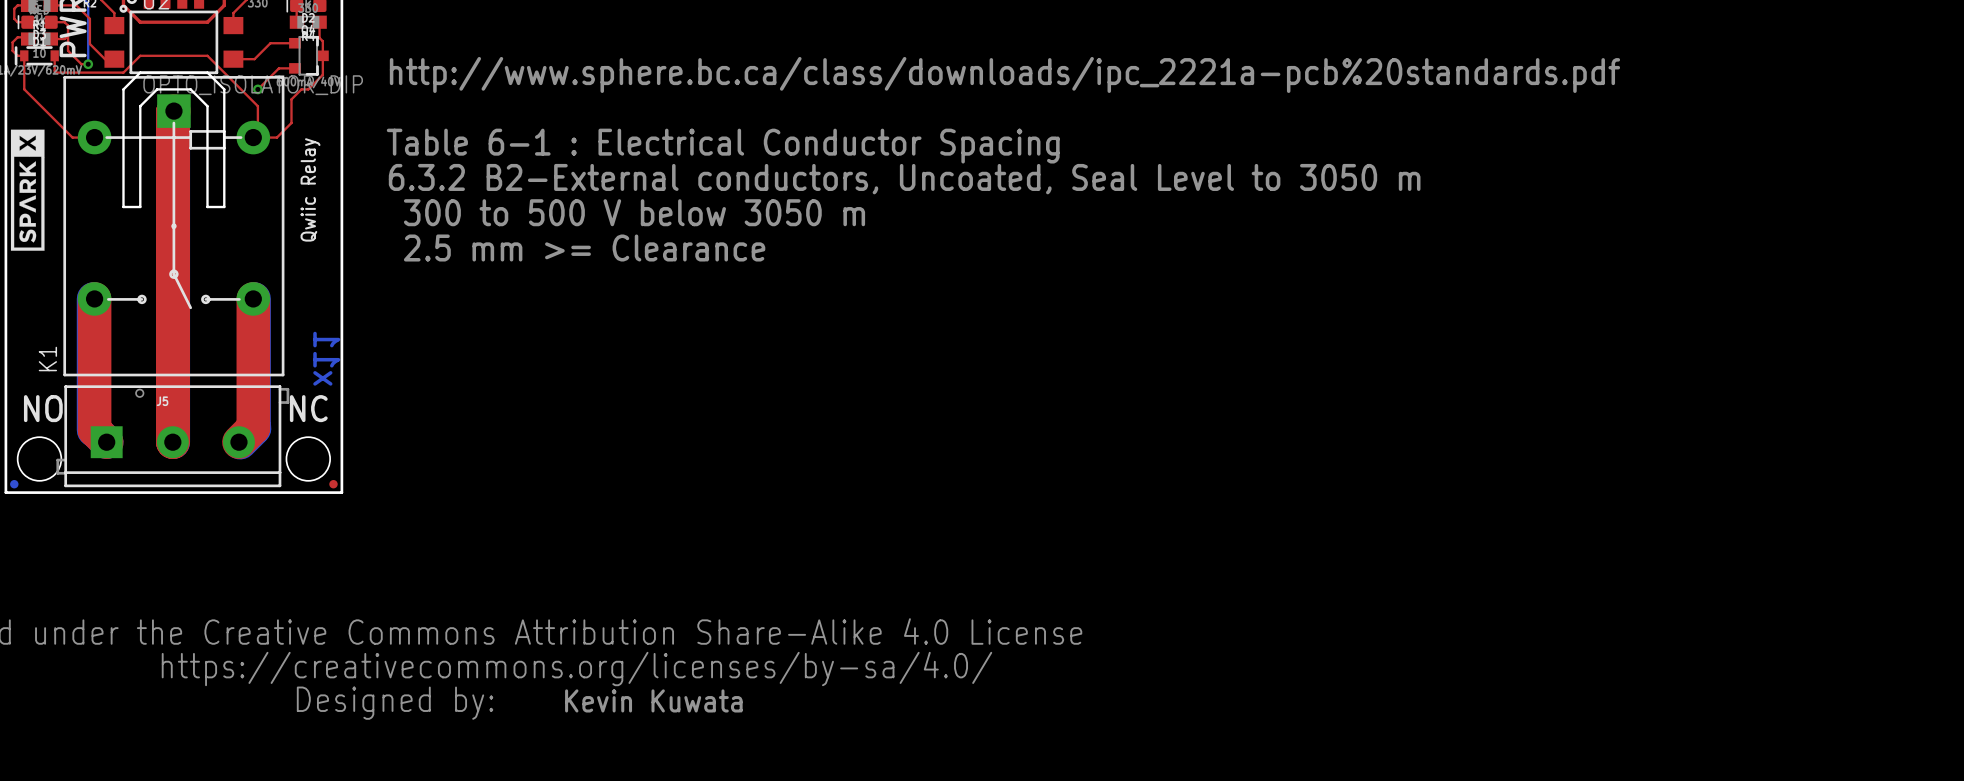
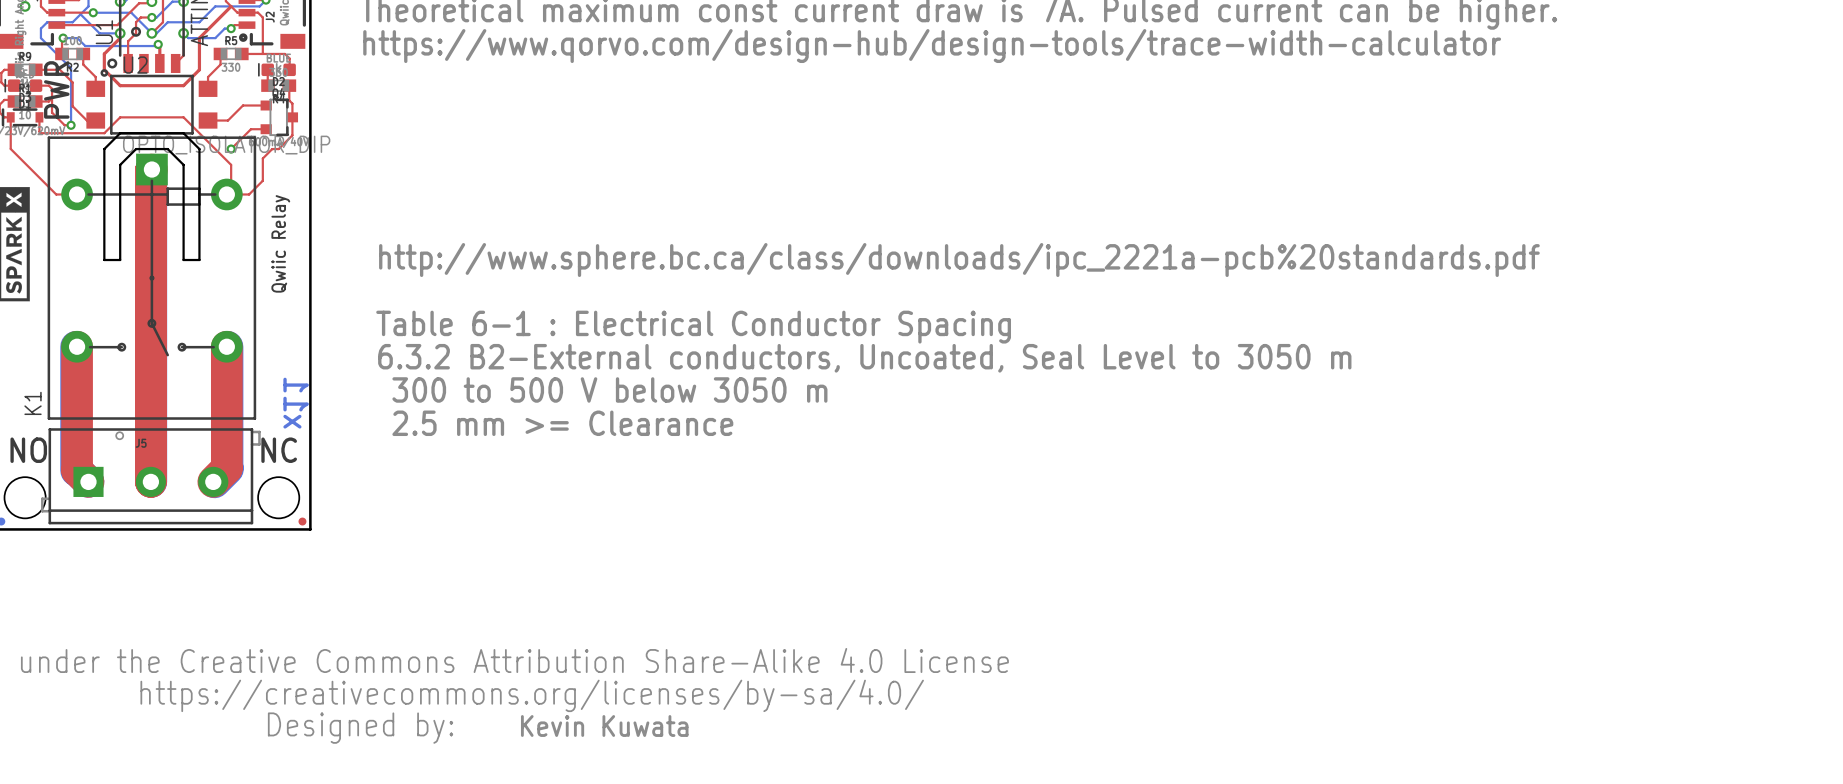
text position: http://www.sphere.bc.ca/class/downloads/ipc_2221a-pcb%20standards.pdf (1004, 74) -> http://www.sphere.bc.ca/class/downloads/ipc_2221a-pcb%20standards.pdf (959, 260)
text position: Table 6-1 : Electrical Conductor Spacing (723, 146) -> Table 6-1 : Electrical Conductor Spacing (693, 327)
text position: 6.3.2 B2-External conductors, Uncoated, Seal Level to 3050 m (904, 179) -> 6.3.2 B2-External conductors, Uncoated, Seal Level to 3050 m (864, 358)
text position: 300 to 500 V below 3050 m (634, 212) -> 300 to 500 V below 3050 m (609, 389)
text position: 2.5 mm >= Clearance (584, 248) -> 2.5 mm >= Clearance (562, 423)

